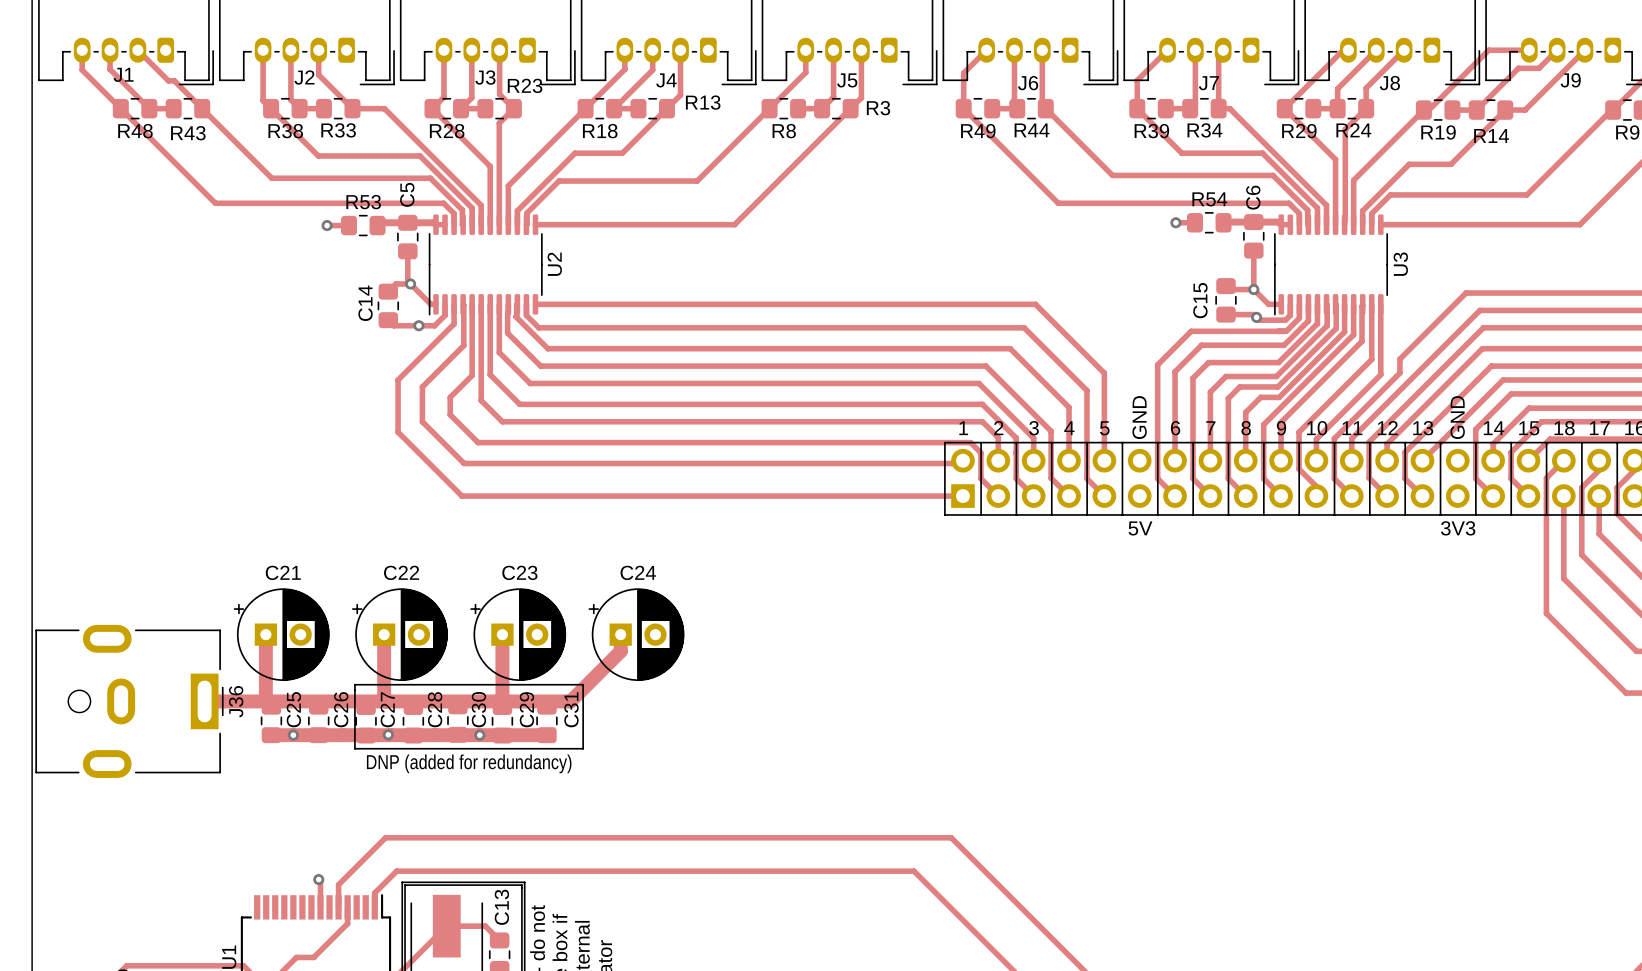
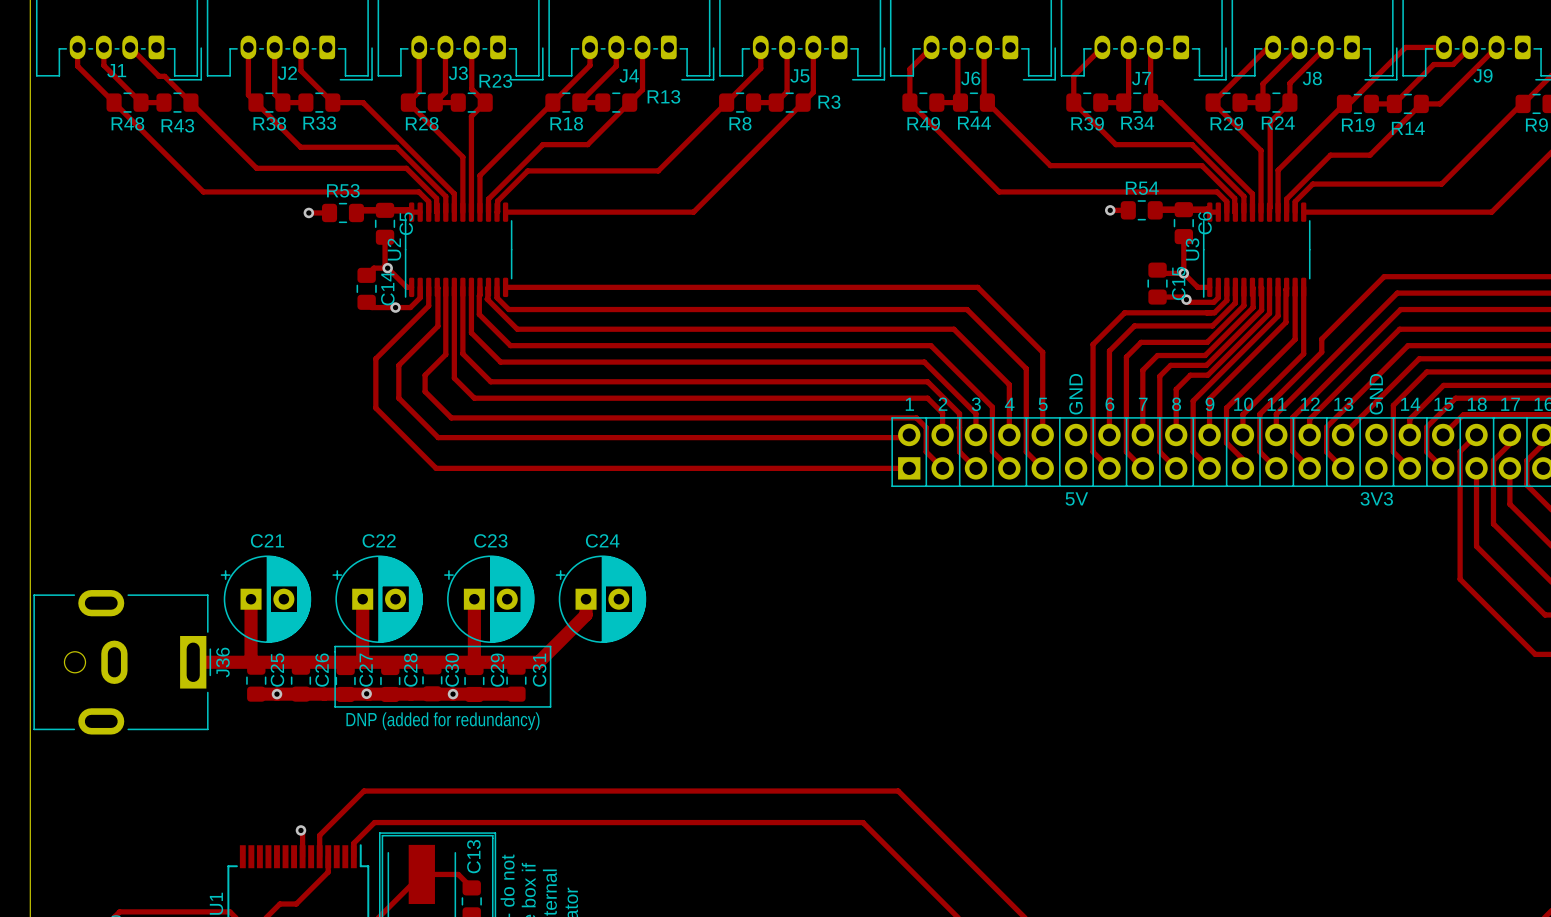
C5 name position: C5 (407, 194) -> C5 (406, 223)
C6 name position: C6 (1253, 197) -> C6 (1205, 223)
U2 name position: U2 (554, 264) -> U2 (394, 249)
U3 name position: U3 (1400, 264) -> U3 (1192, 249)
C15 name position: C15 (1200, 300) -> C15 (1178, 283)
C14 name position: C14 (365, 303) -> C14 (387, 288)

